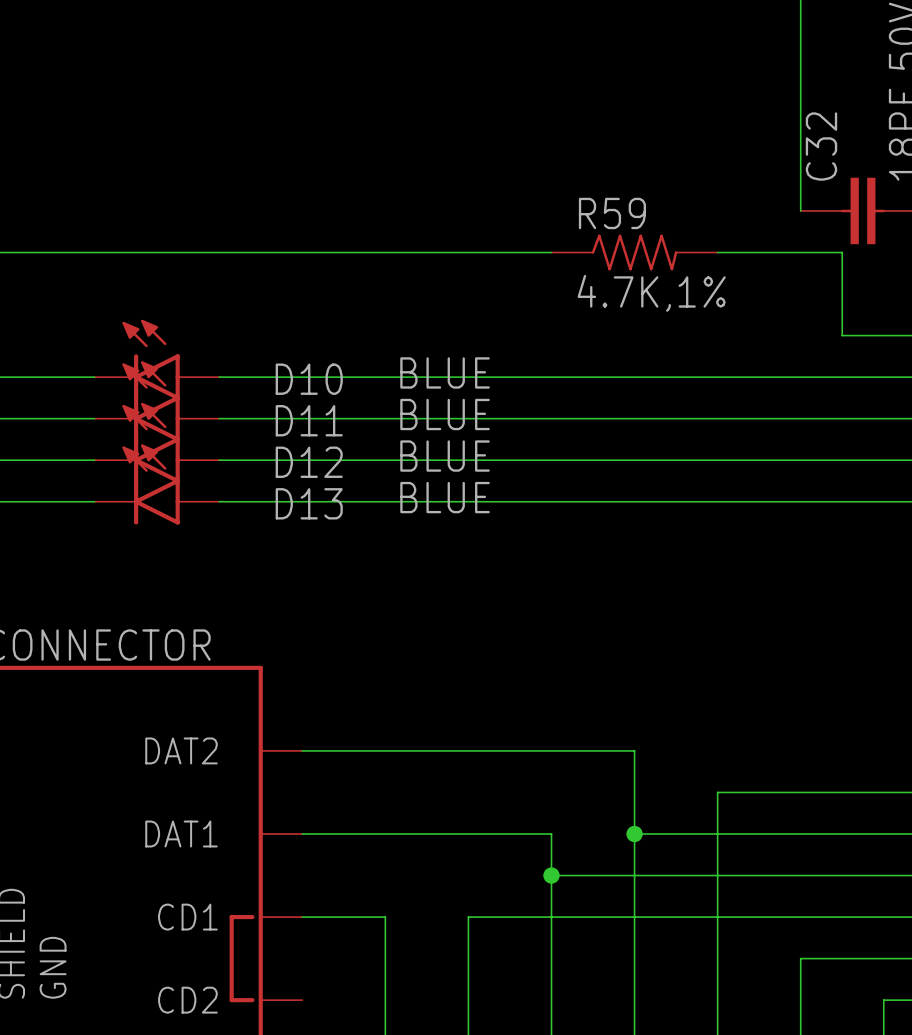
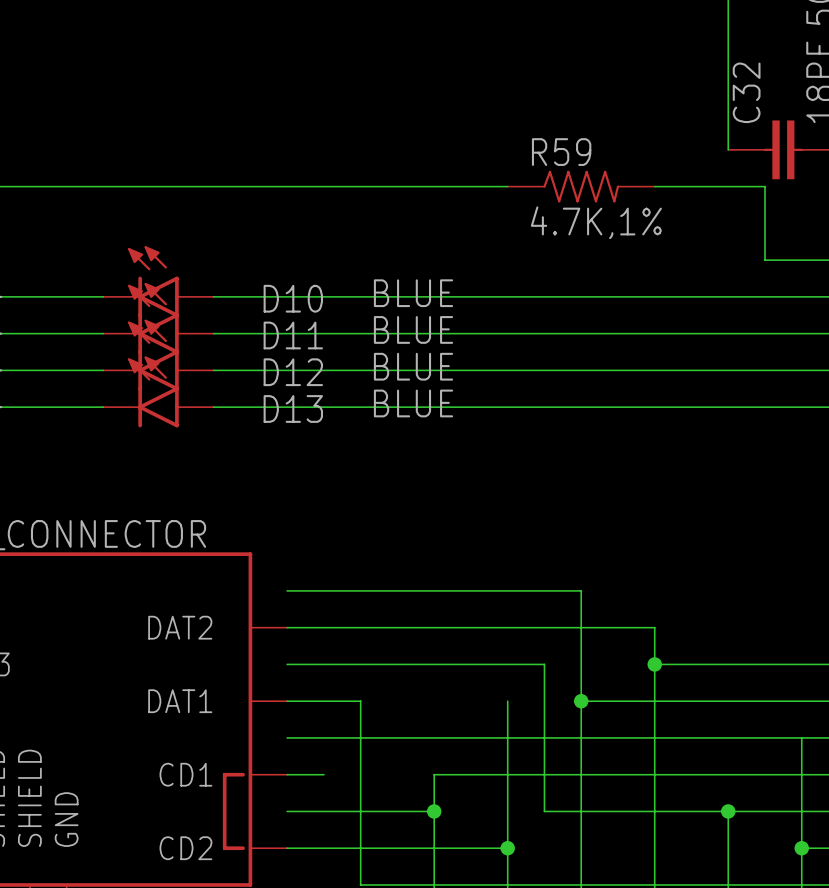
wire: none -> (287, 590) (581, 590) (581, 627) (654, 627) (654, 664)
wire: none -> (287, 664) (544, 664) (544, 811) (728, 811)
junction: none -> (654, 664)
wire: (385, 834) (551, 834) -> (287, 811) (434, 811)
wire: none -> (287, 737) (507, 737)
junction: (551, 875) -> none
wire: none -> (801, 737) (801, 848)
wire: (343, 917) (385, 917) -> (360, 701) (360, 774)
junction: none -> (434, 811)
junction: none -> (728, 811)
wire: none -> (287, 848) (507, 848)
junction: none -> (507, 848)
junction: none -> (801, 848)

